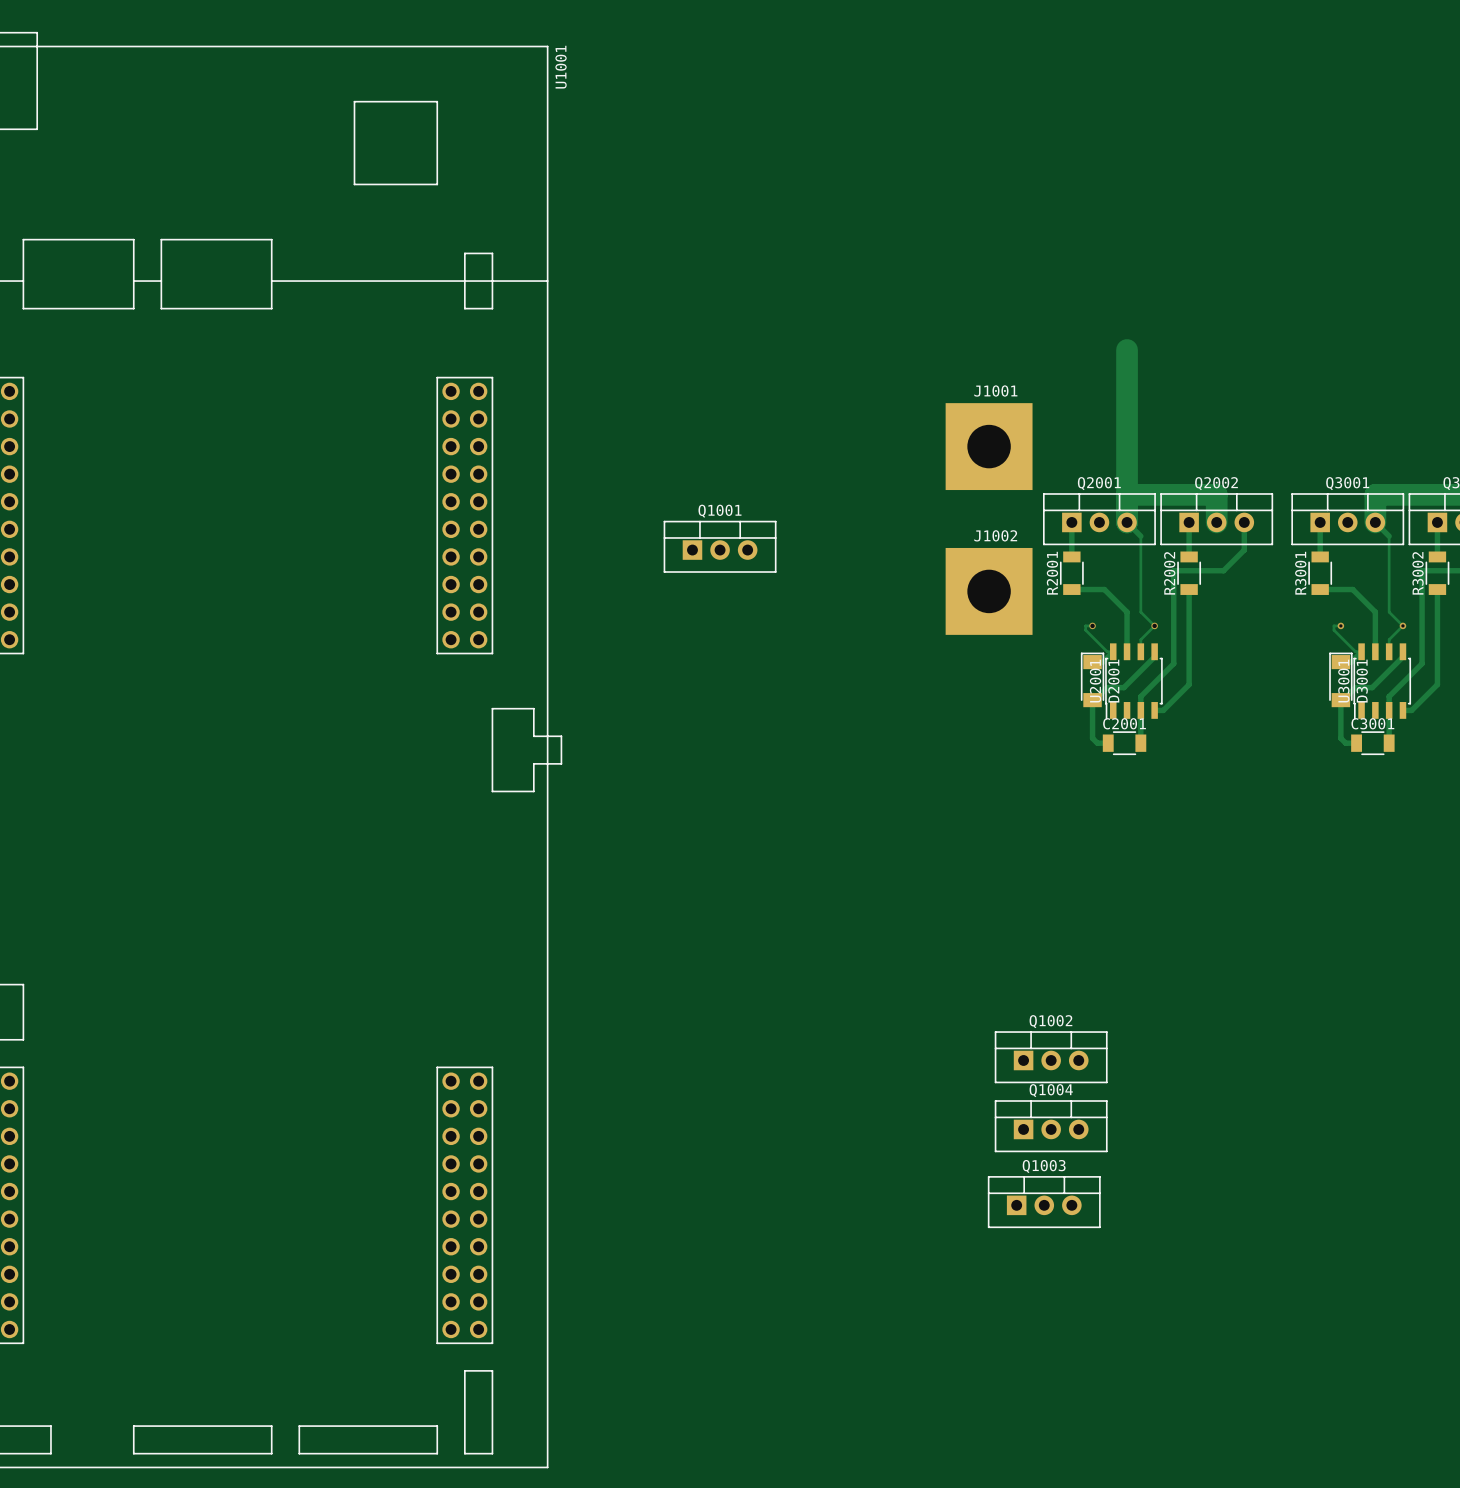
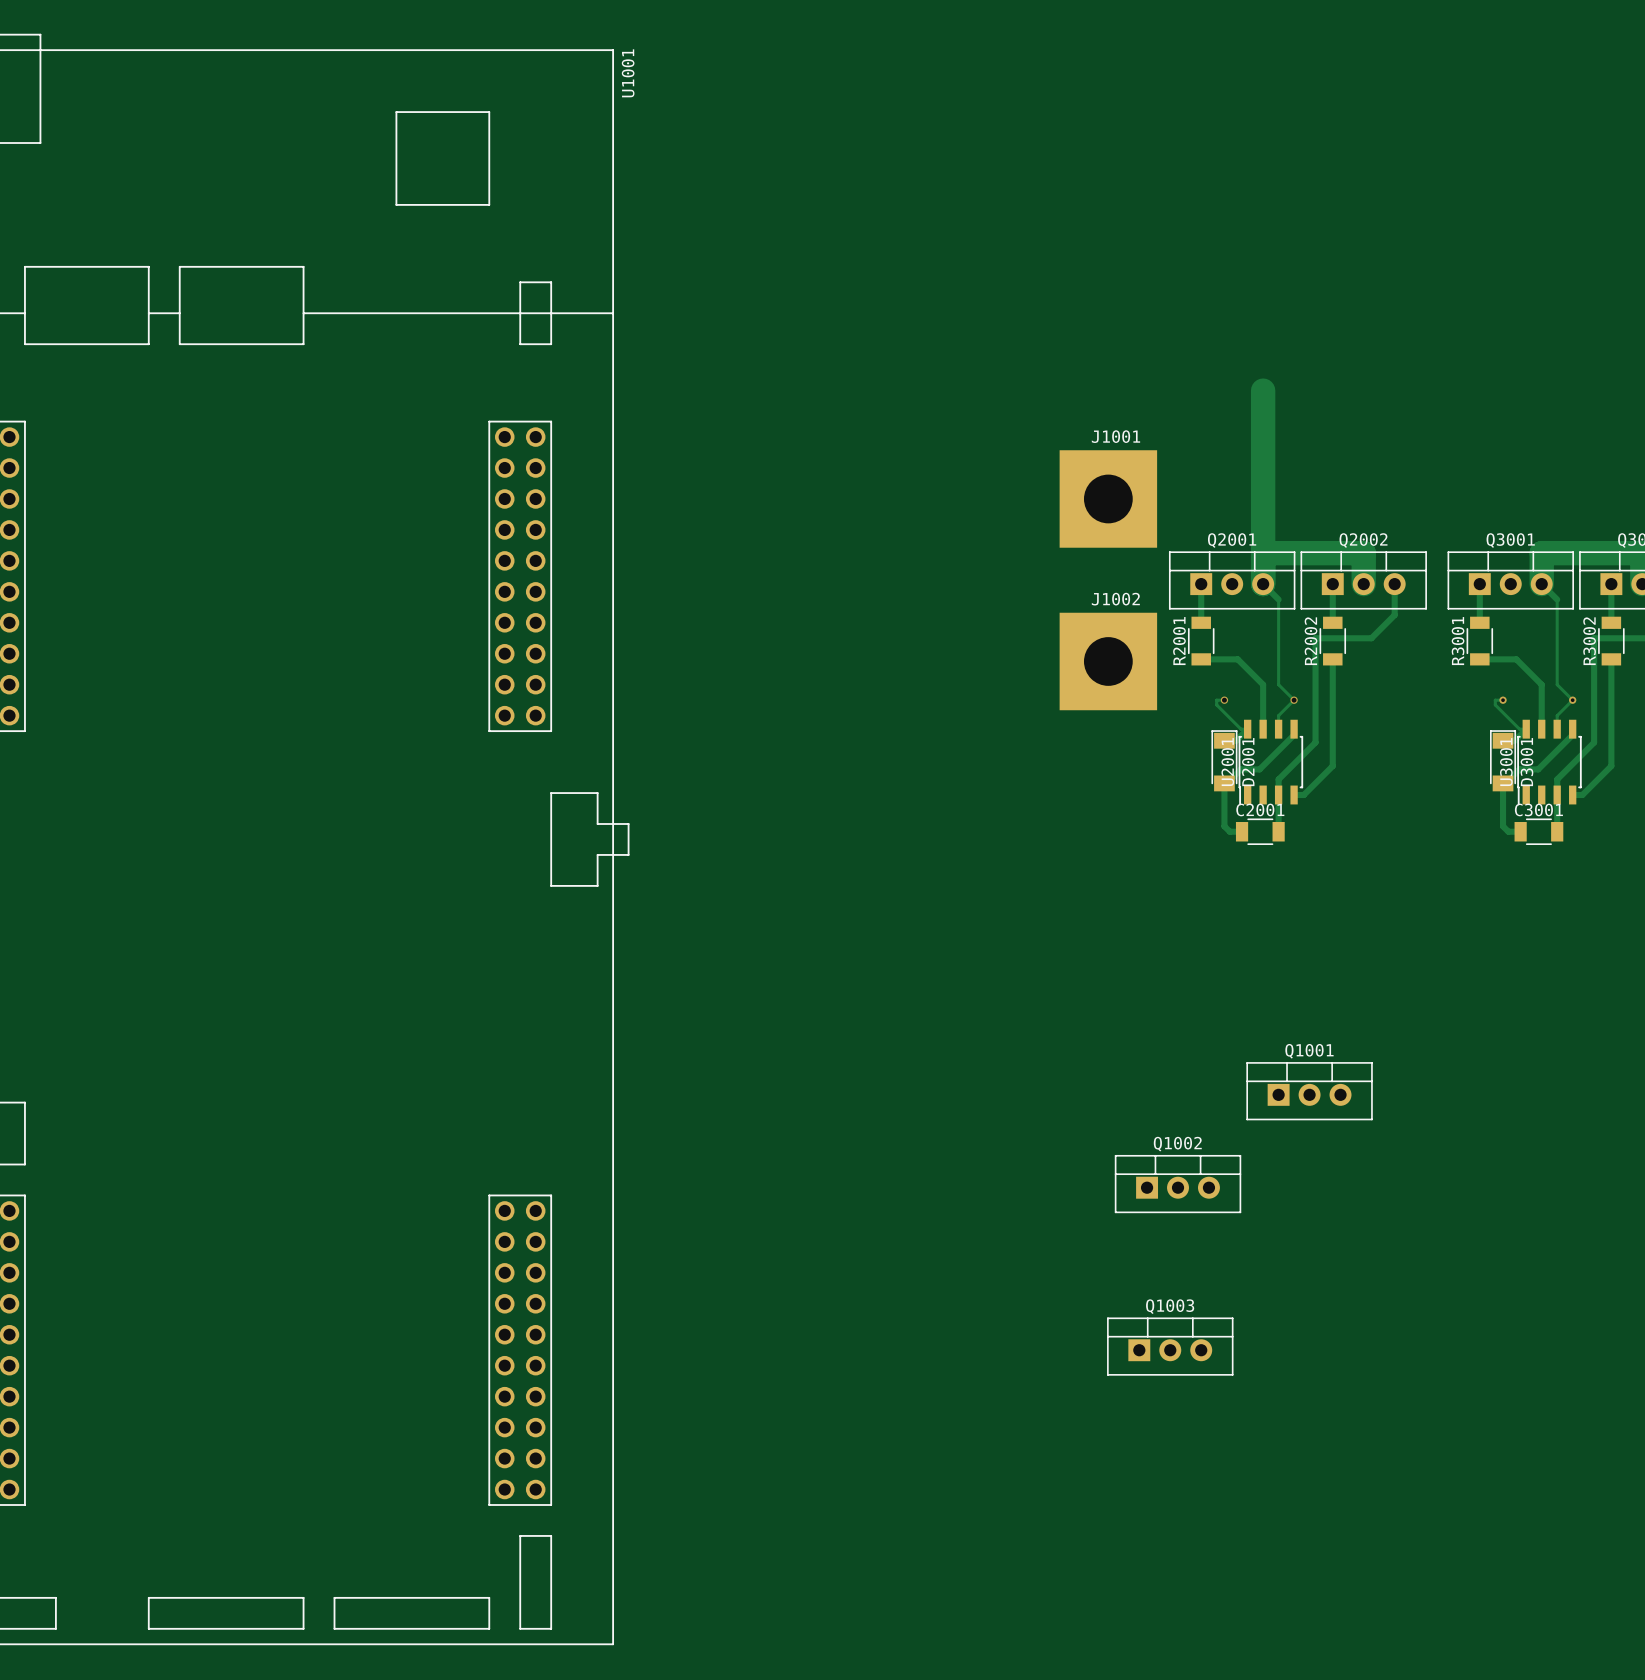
Q1001 position: (720, 546) -> (1309, 1091)
Q1004: (1051, 1126) -> none

